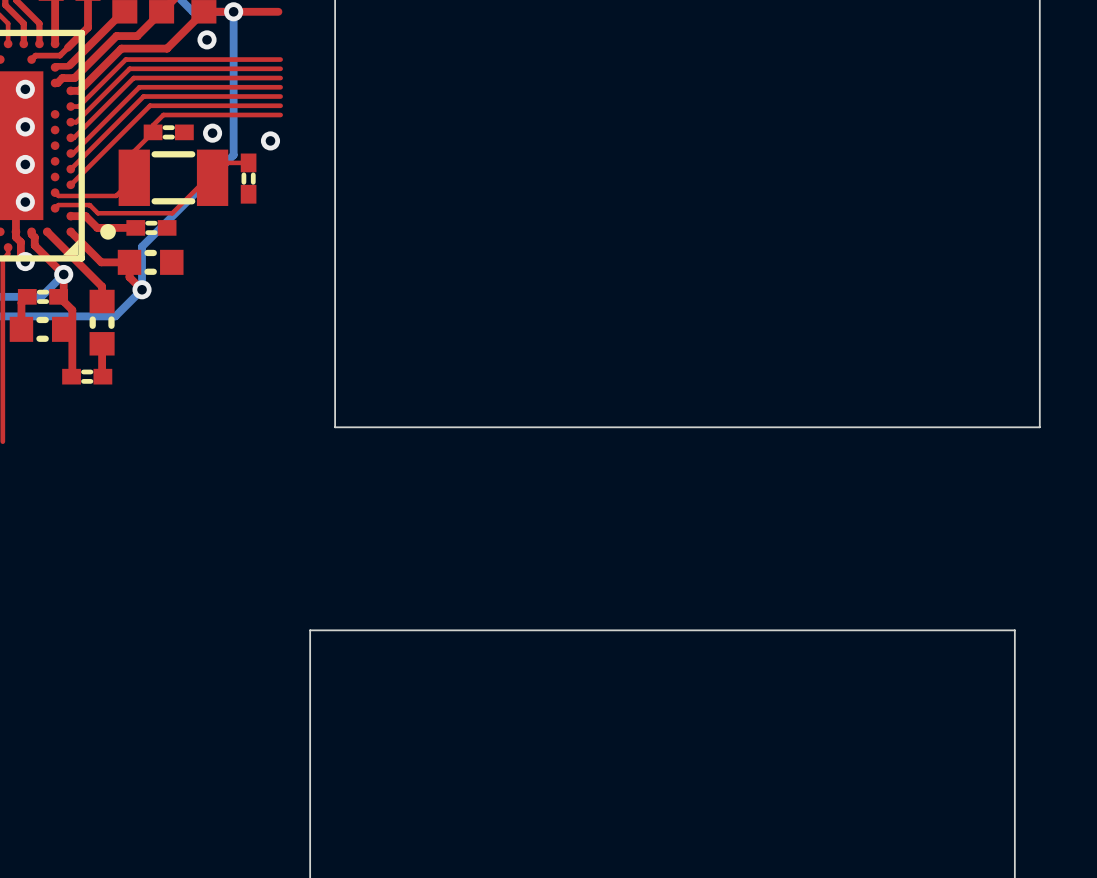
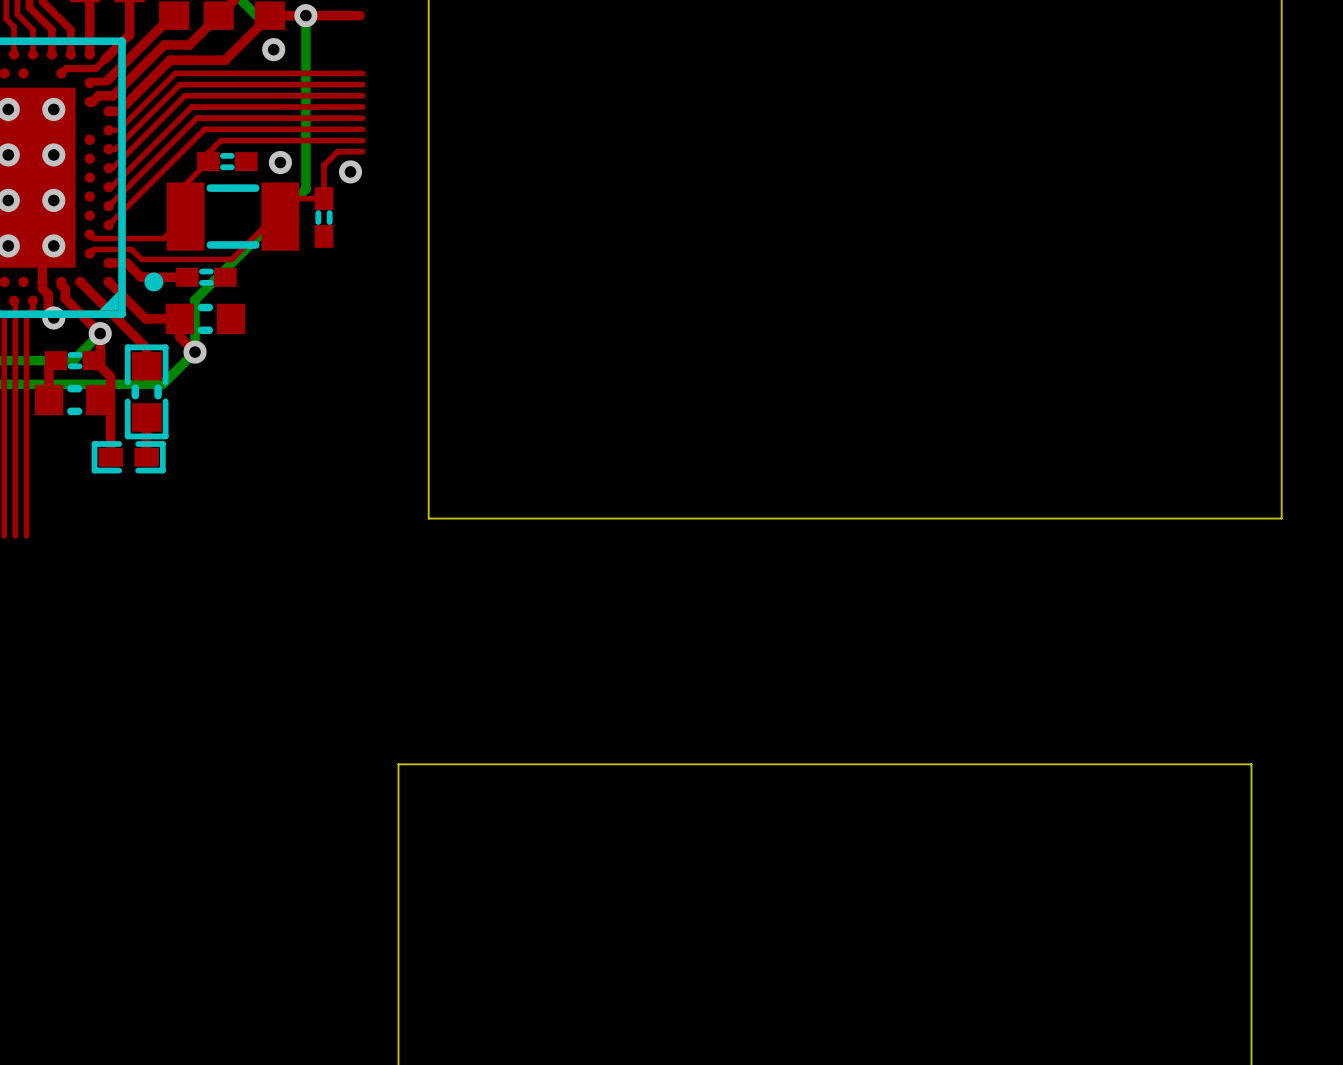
top track: none -> (362, 151) (337, 151) (324, 165) (324, 198)
part footprint: [89, 289, 115, 356] -> [124, 344, 169, 440]
part footprint: [62, 368, 113, 385] -> [91, 441, 166, 474]

